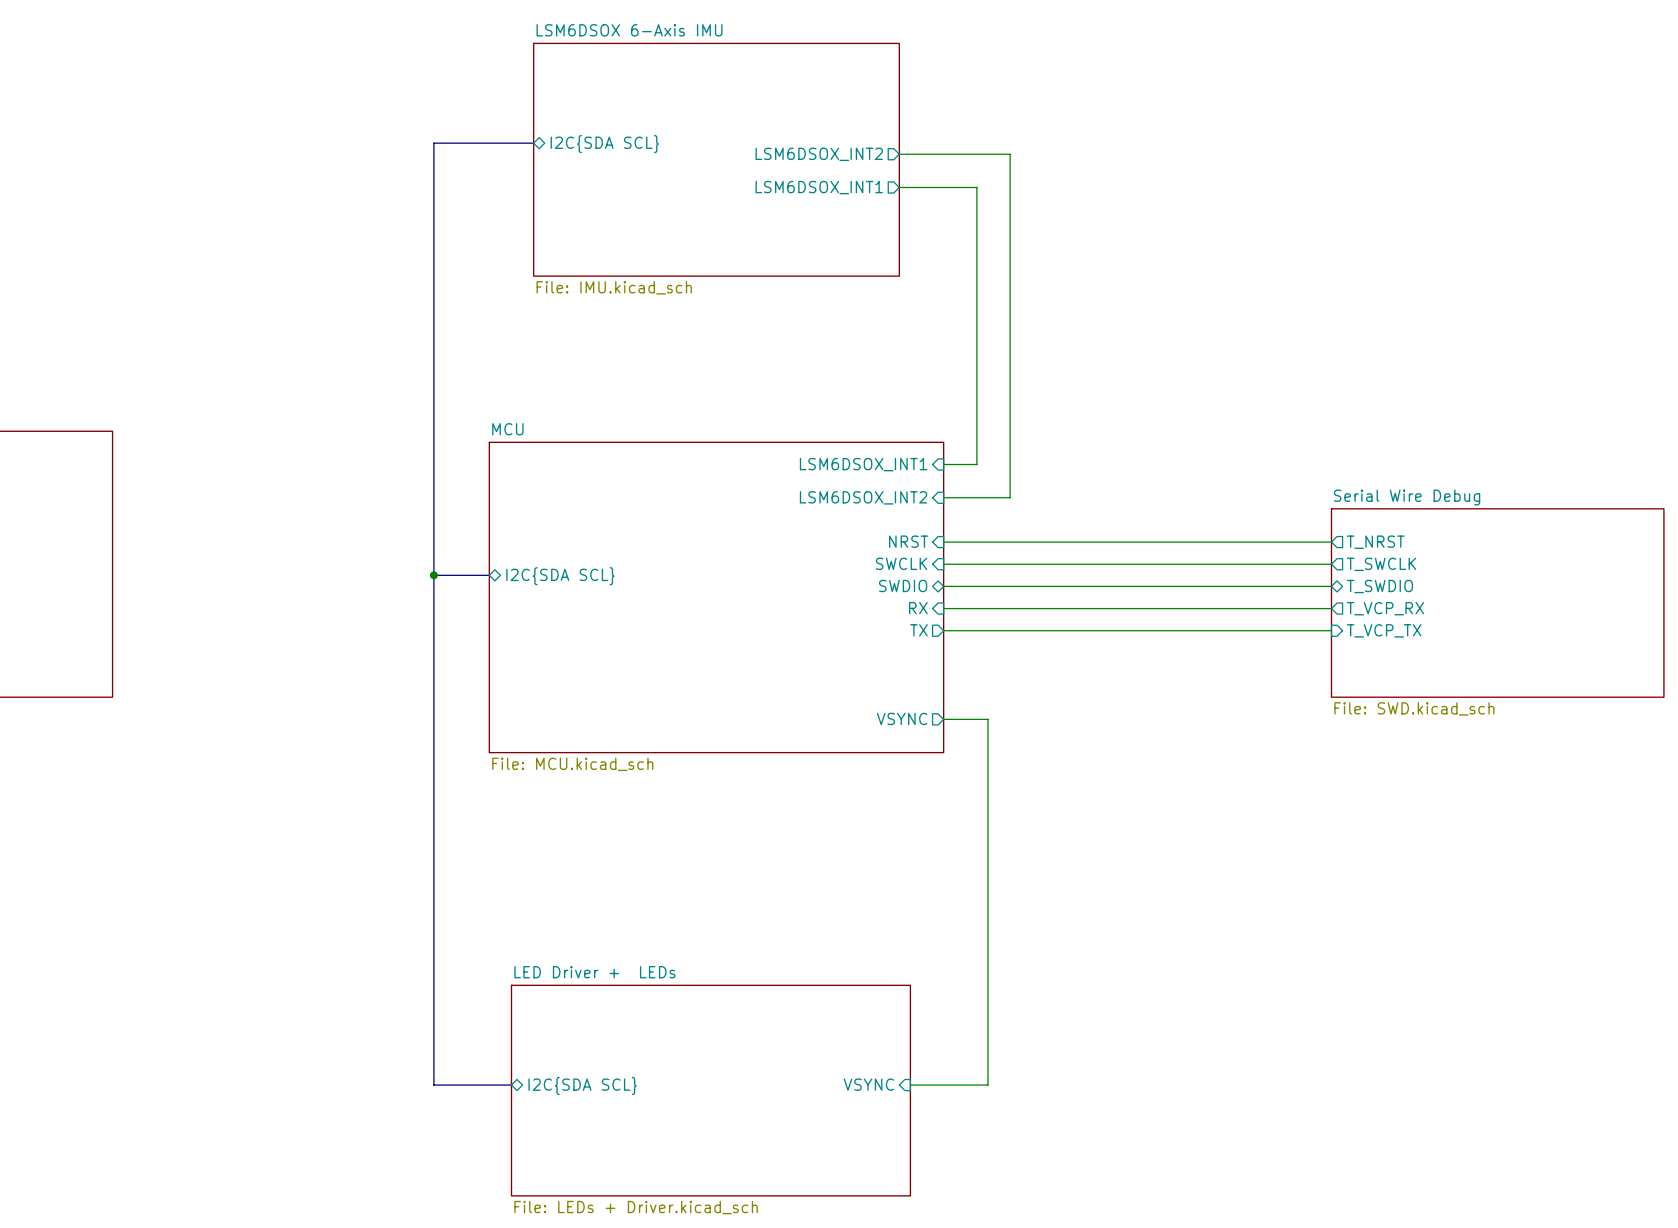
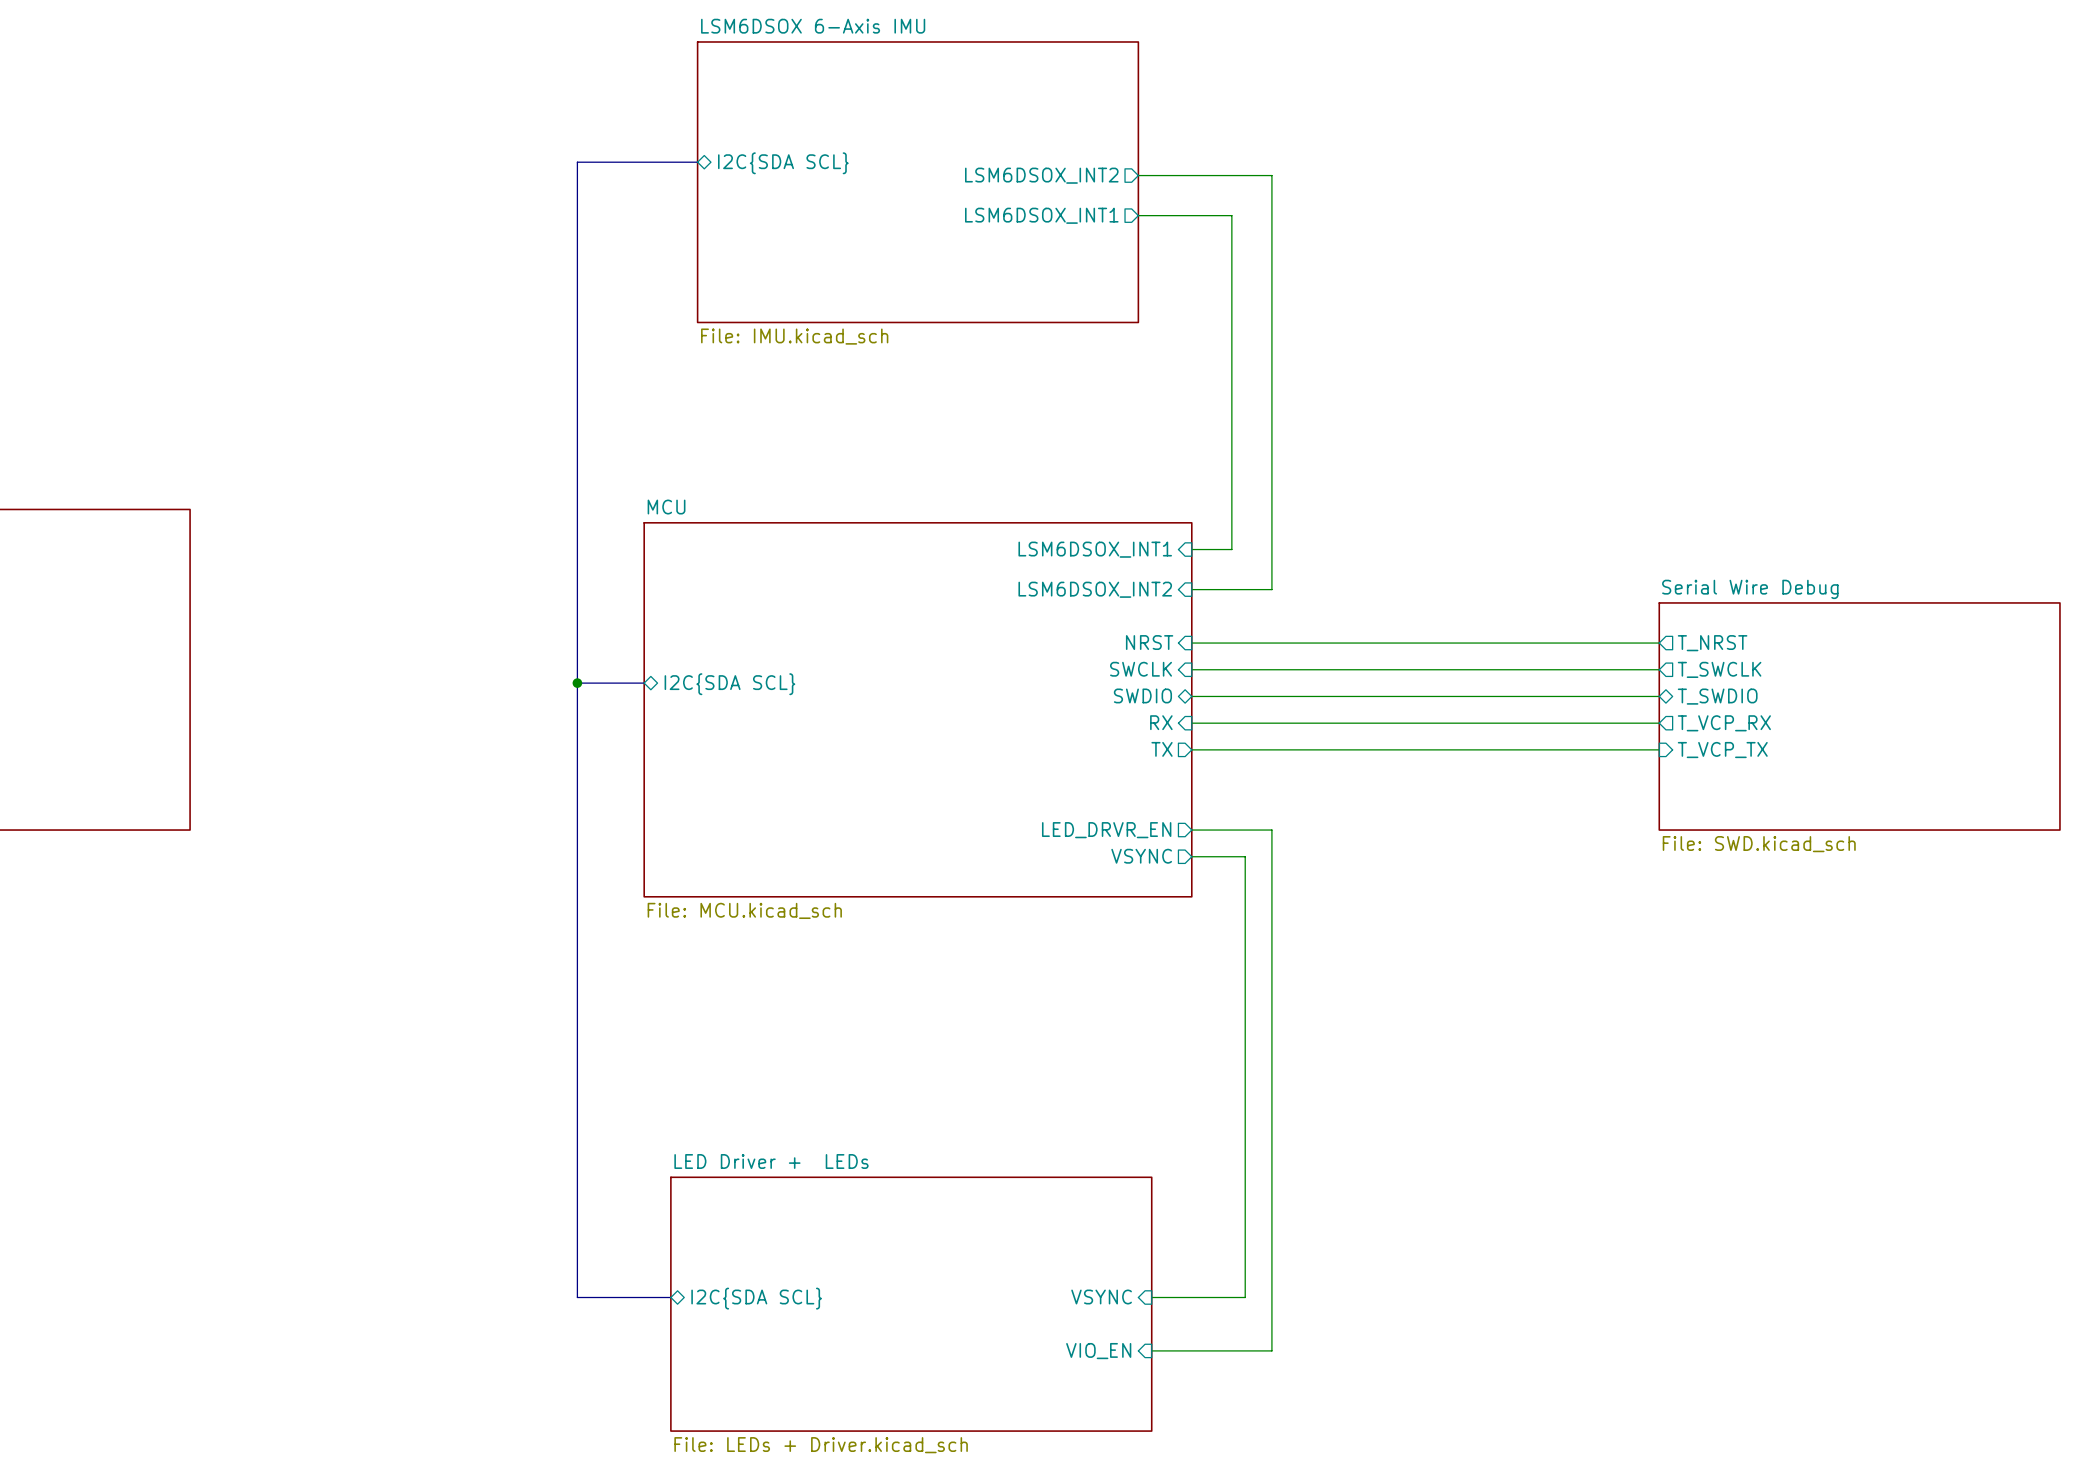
sheet pin: none -> LED_DRVR_EN (1106, 830)
wire: none -> (1191, 830) (1271, 830) (1271, 1350) (1151, 1350)
sheet pin: none -> VIO_EN (1098, 1351)

